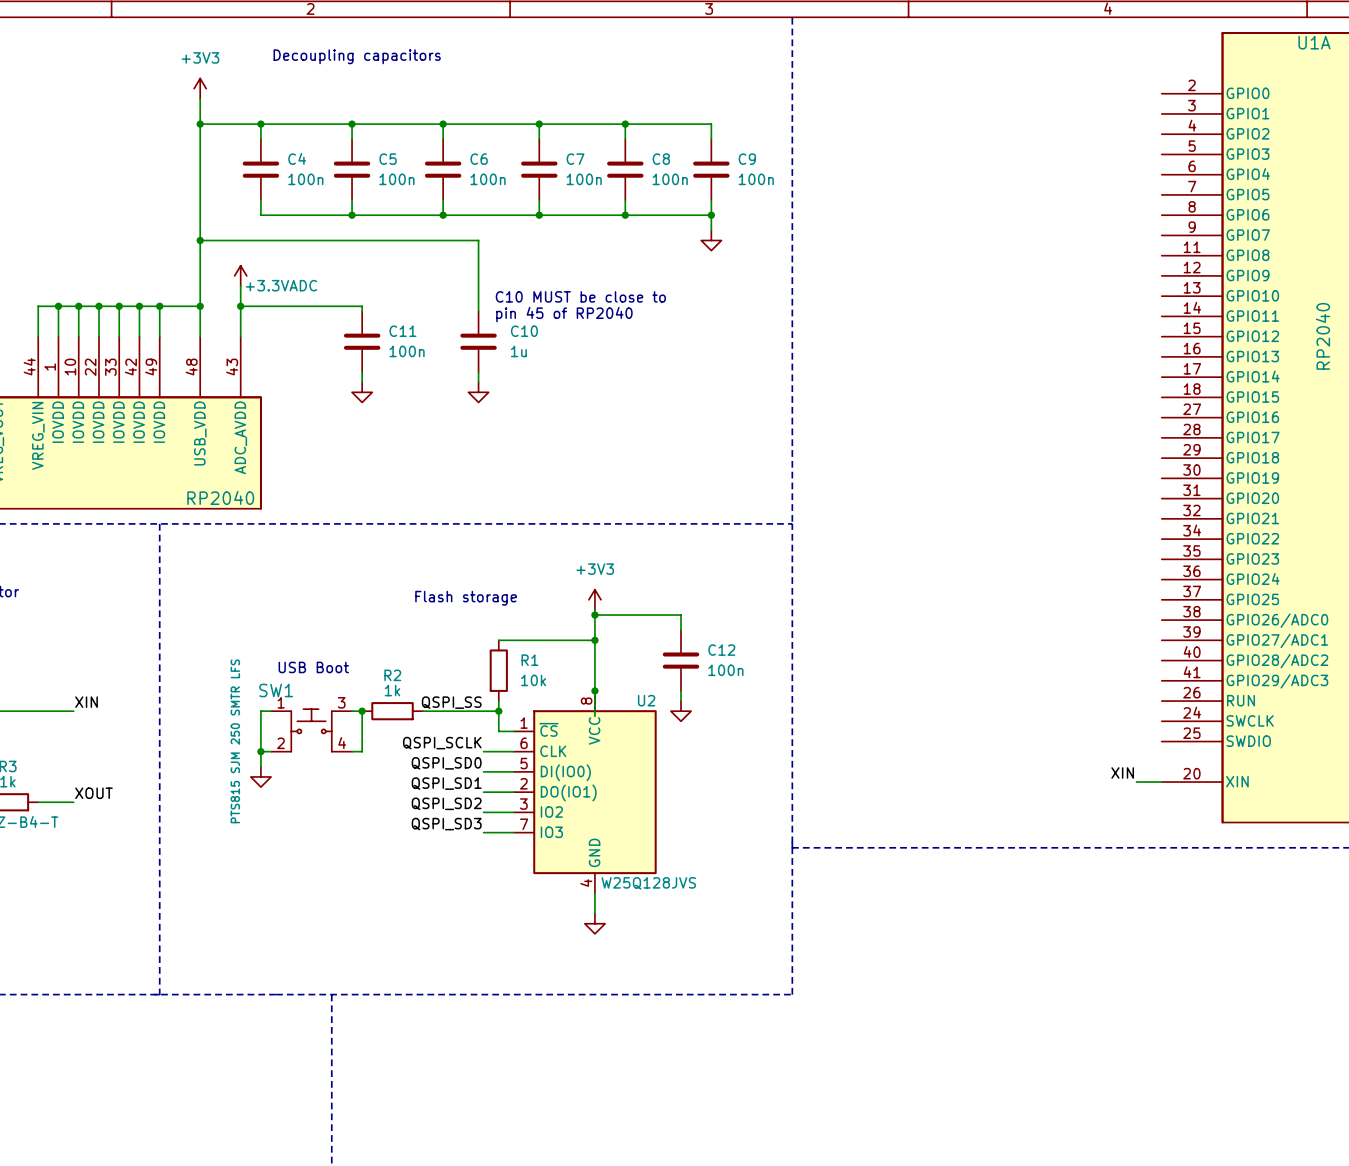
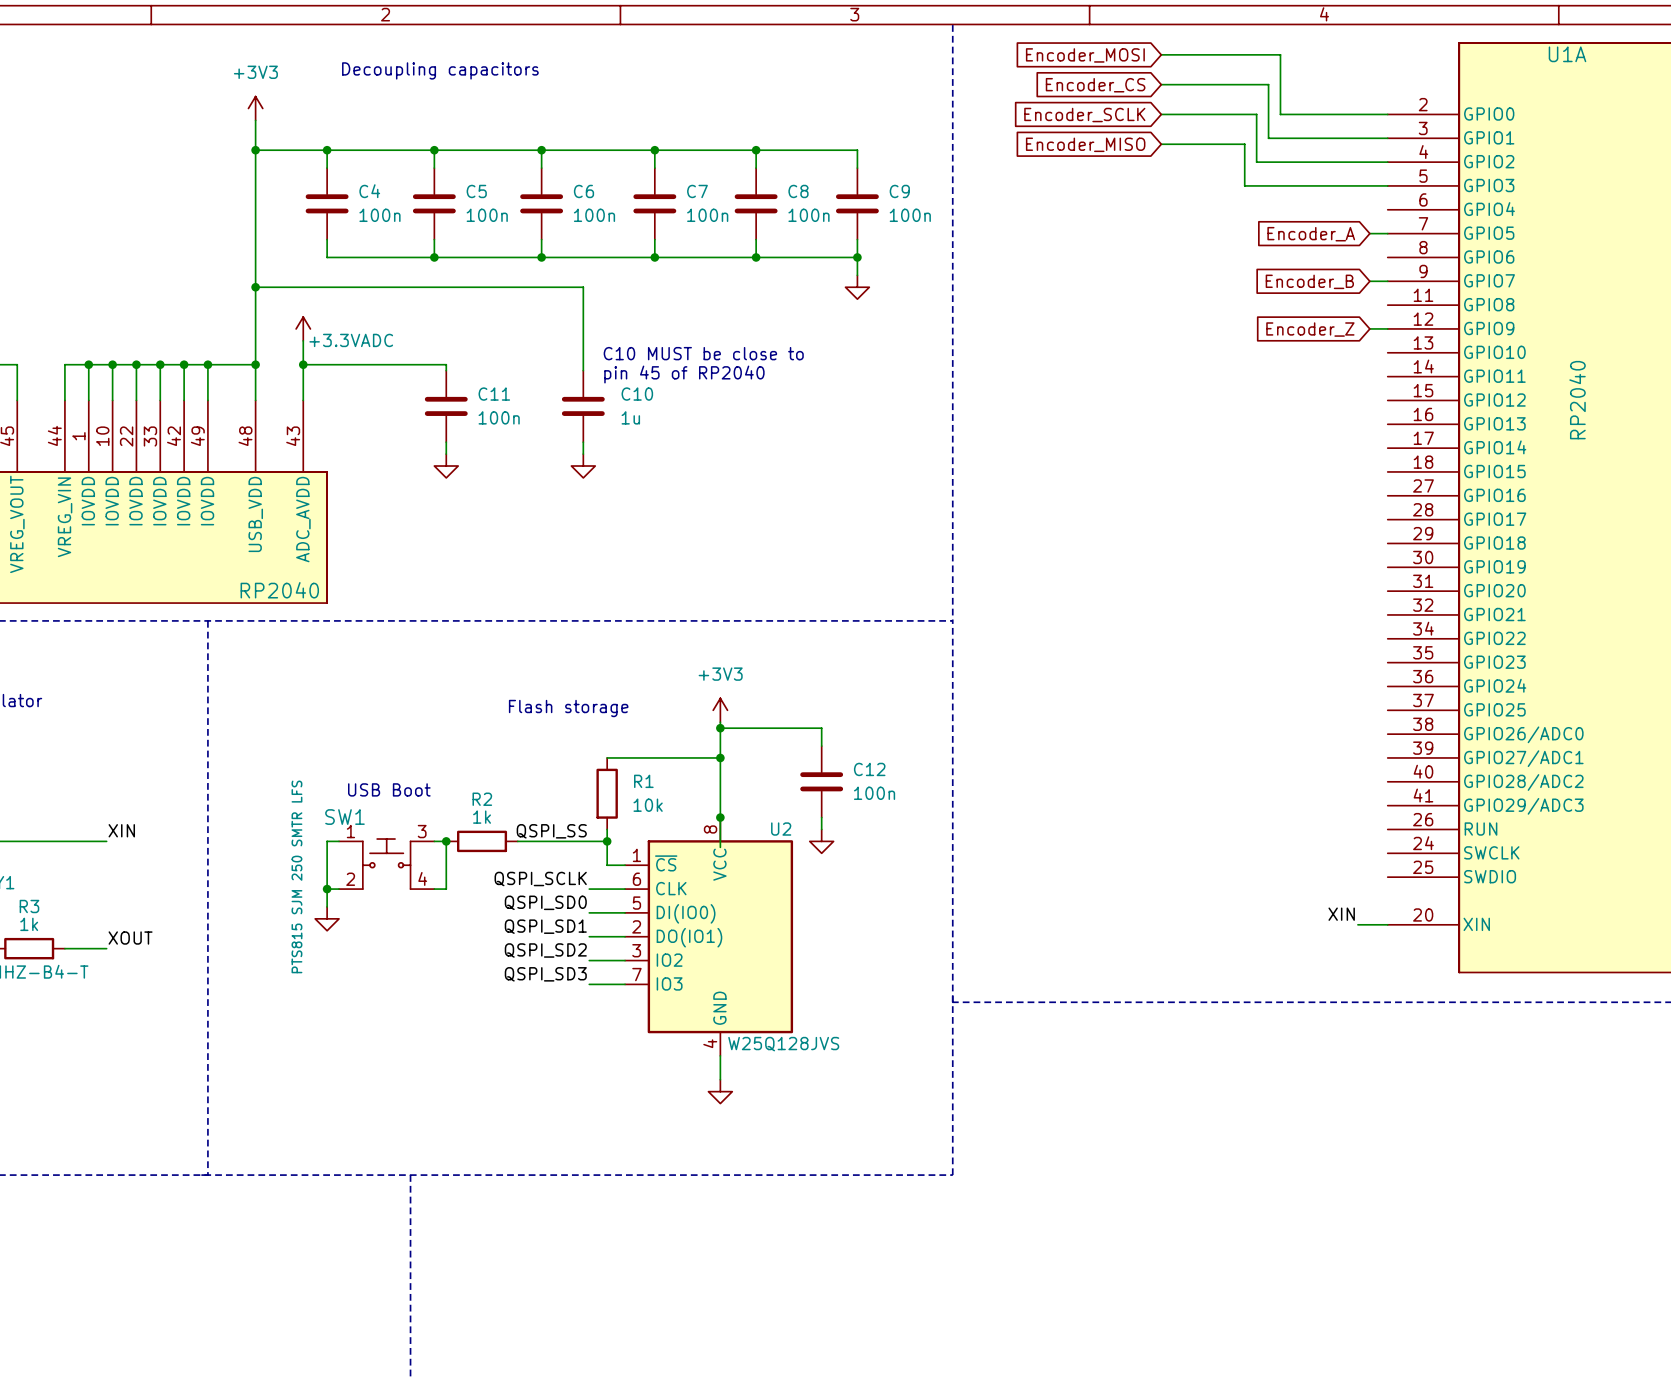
global label: none -> Encoder_MOSI (1085, 55)
wire: none -> (1161, 54) (1280, 54) (1280, 114) (1387, 114)
global label: none -> Encoder_CS (1095, 85)
wire: none -> (1161, 84) (1268, 84) (1268, 138) (1387, 138)
wire: none -> (1161, 114) (1256, 114) (1256, 162) (1387, 162)
global label: none -> Encoder_SCLK (1084, 115)
global label: none -> Encoder_MISO (1085, 144)
wire: none -> (1161, 144) (1244, 144) (1244, 185) (1387, 185)
wire: none -> (1369, 233) (1387, 233)
global label: none -> Encoder_A (1311, 234)
global label: none -> Encoder_B (1309, 281)
wire: none -> (1369, 281) (1387, 281)
wire: none -> (1369, 328) (1387, 328)
global label: none -> Encoder_Z (1310, 329)

